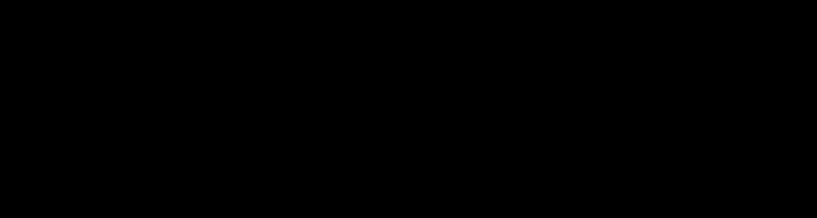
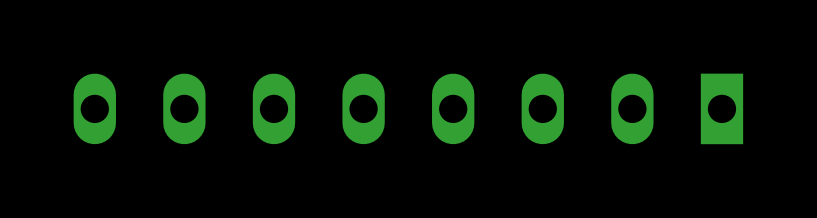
part: none -> (408, 108)

